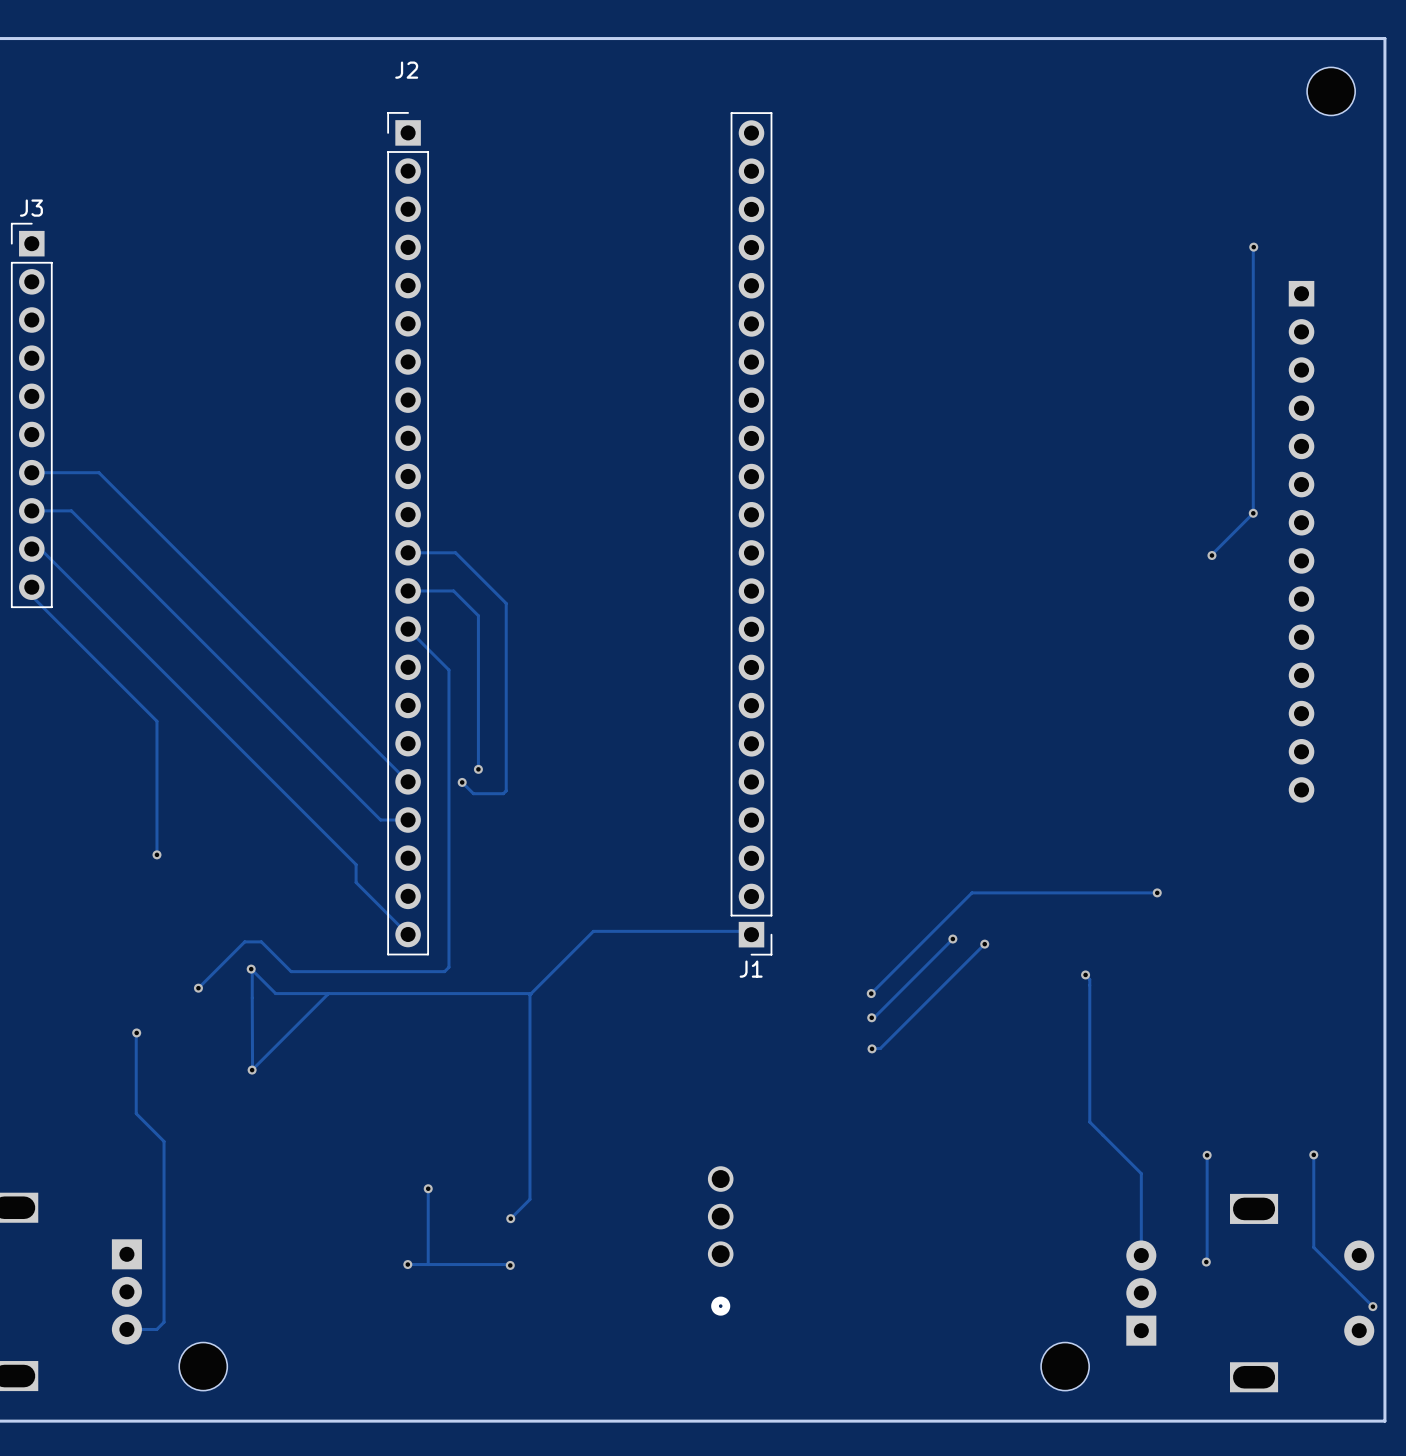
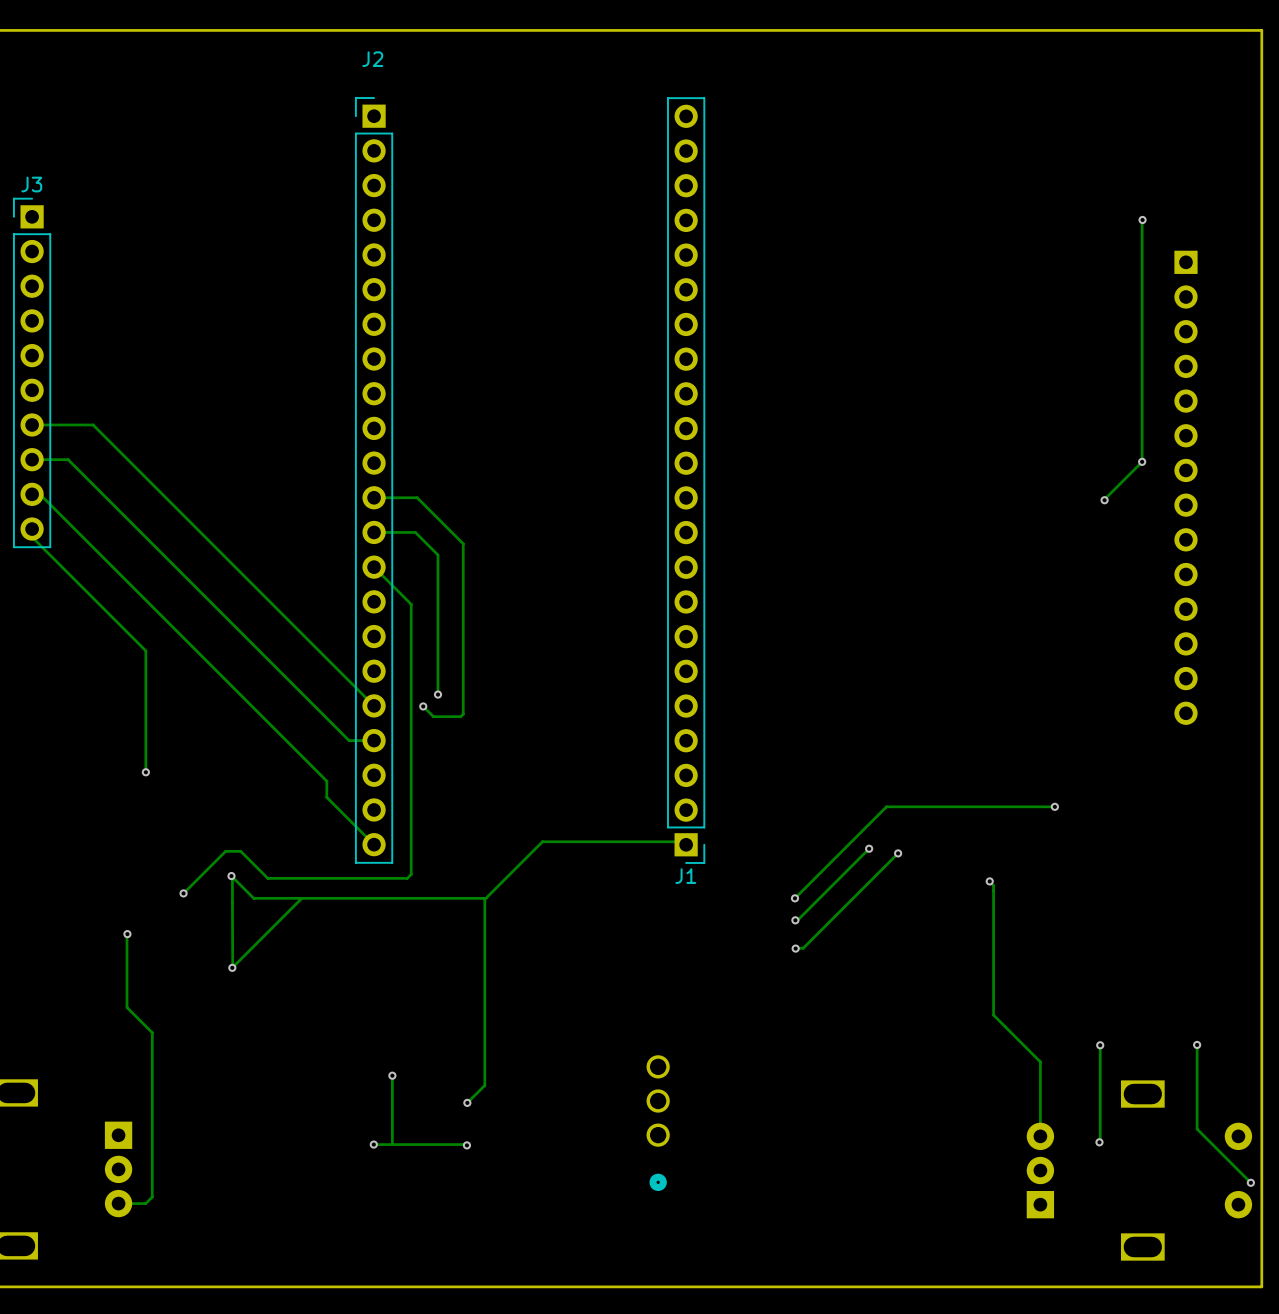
part: (1331, 91) -> none
part: (203, 1366) -> none
part: (1065, 1366) -> none

